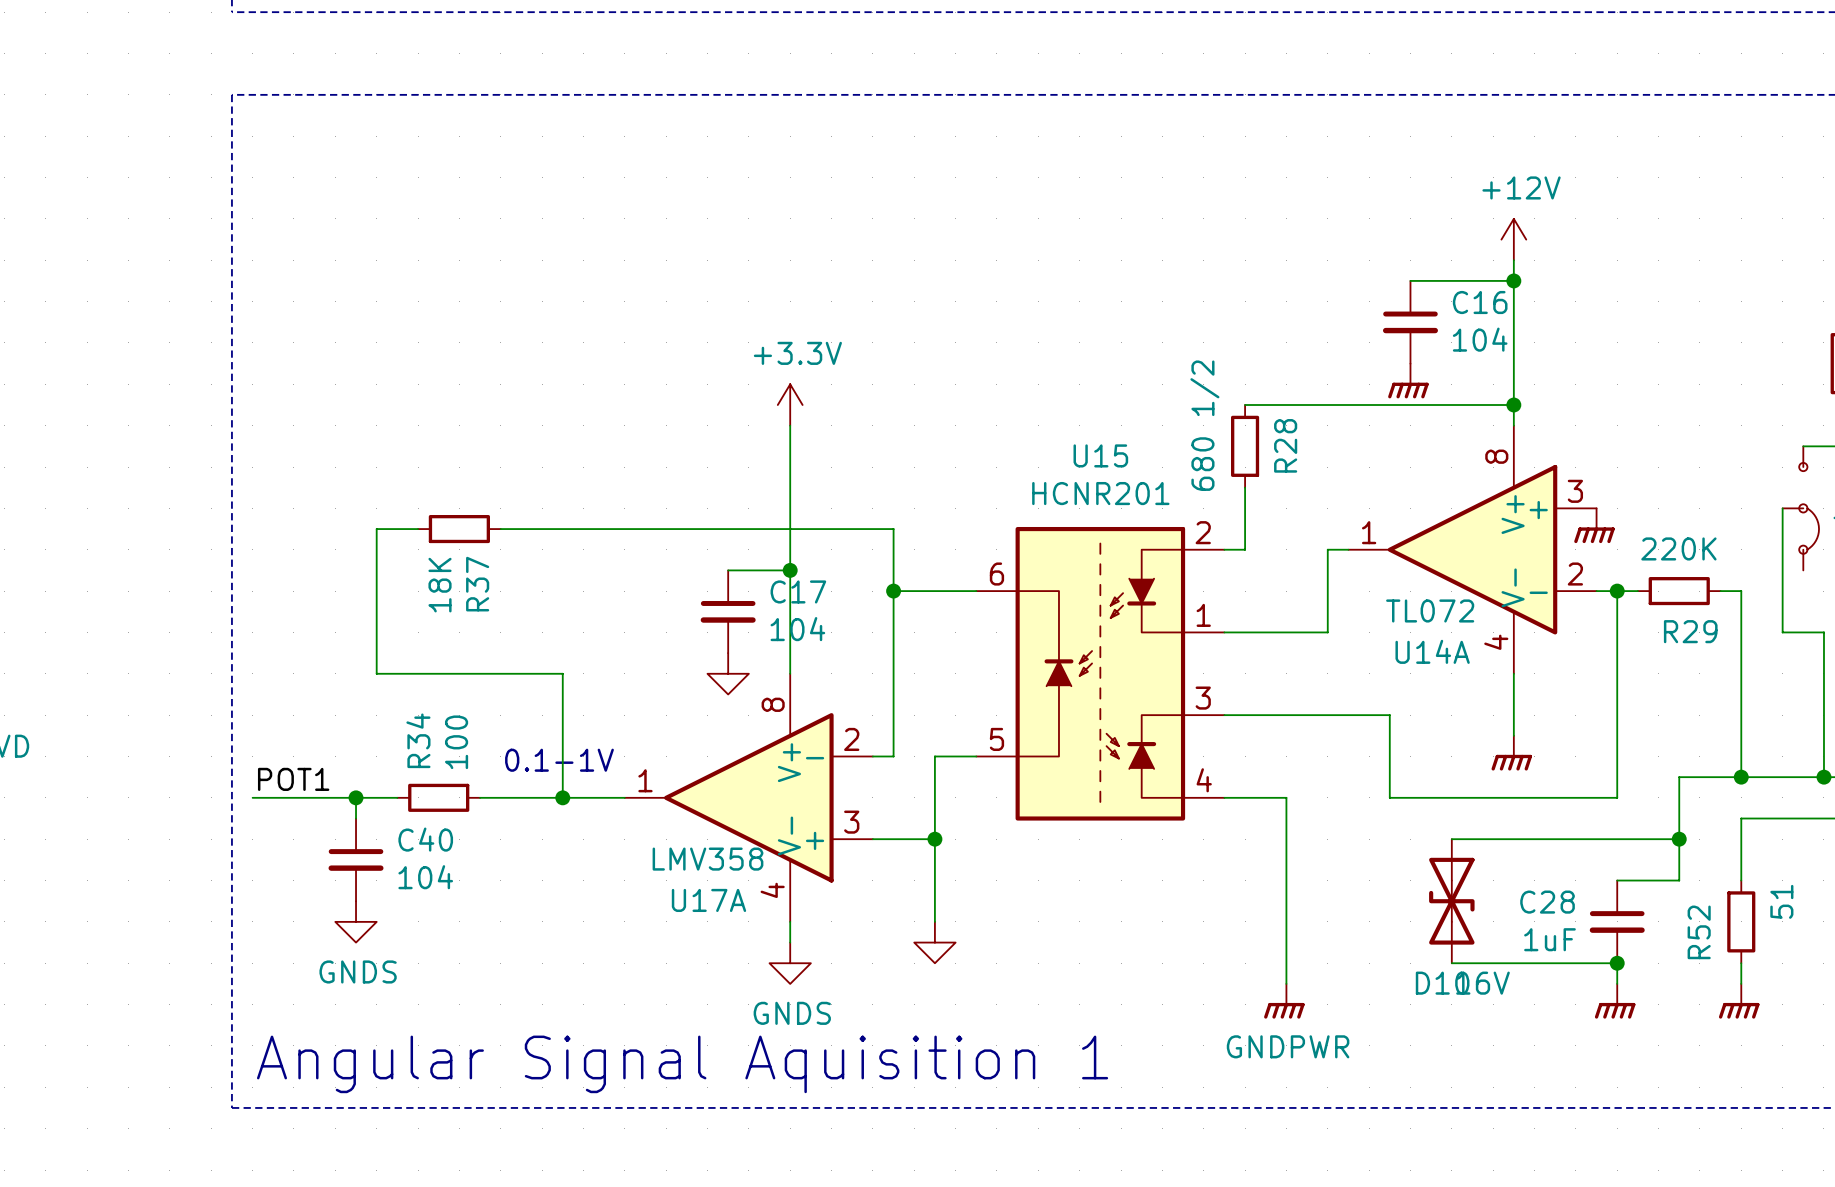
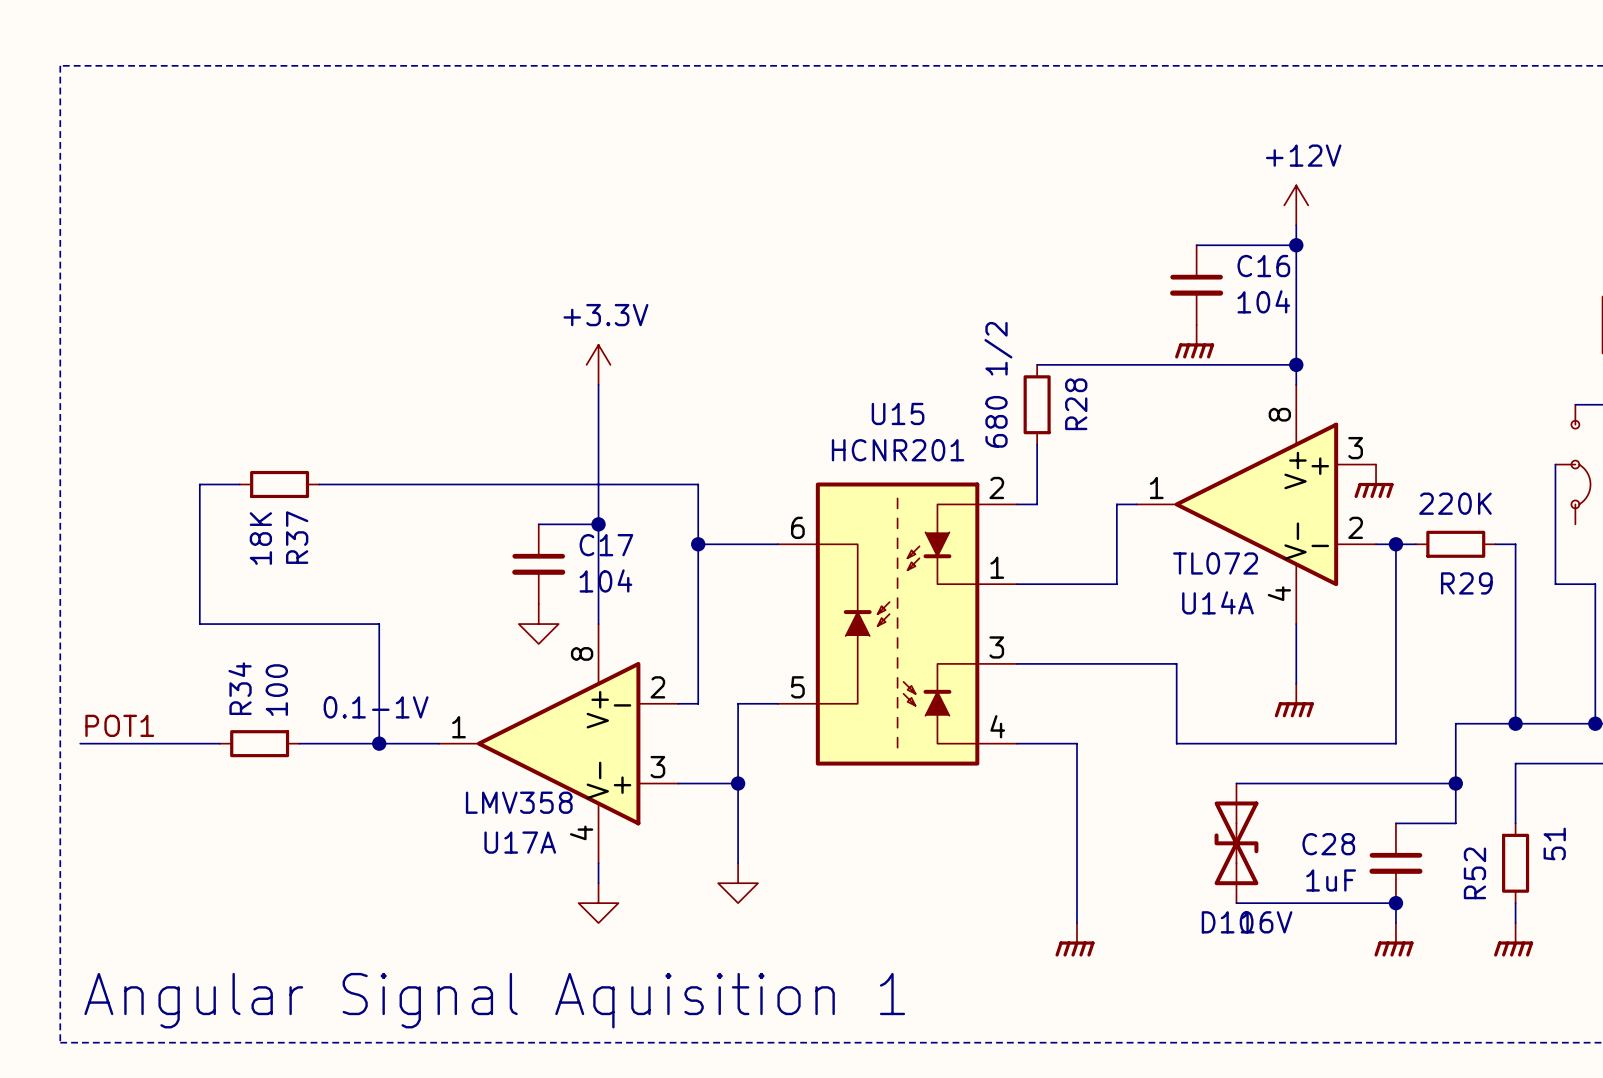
wire: (356, 797) (356, 818) -> none
junction: (356, 797) -> none
C40: 104 (356, 859) -> none
power symbol: GNDS (356, 921) -> none
power symbol text: GNDS (792, 1013) -> none
power symbol text: GNDPWR (1288, 1046) -> none

